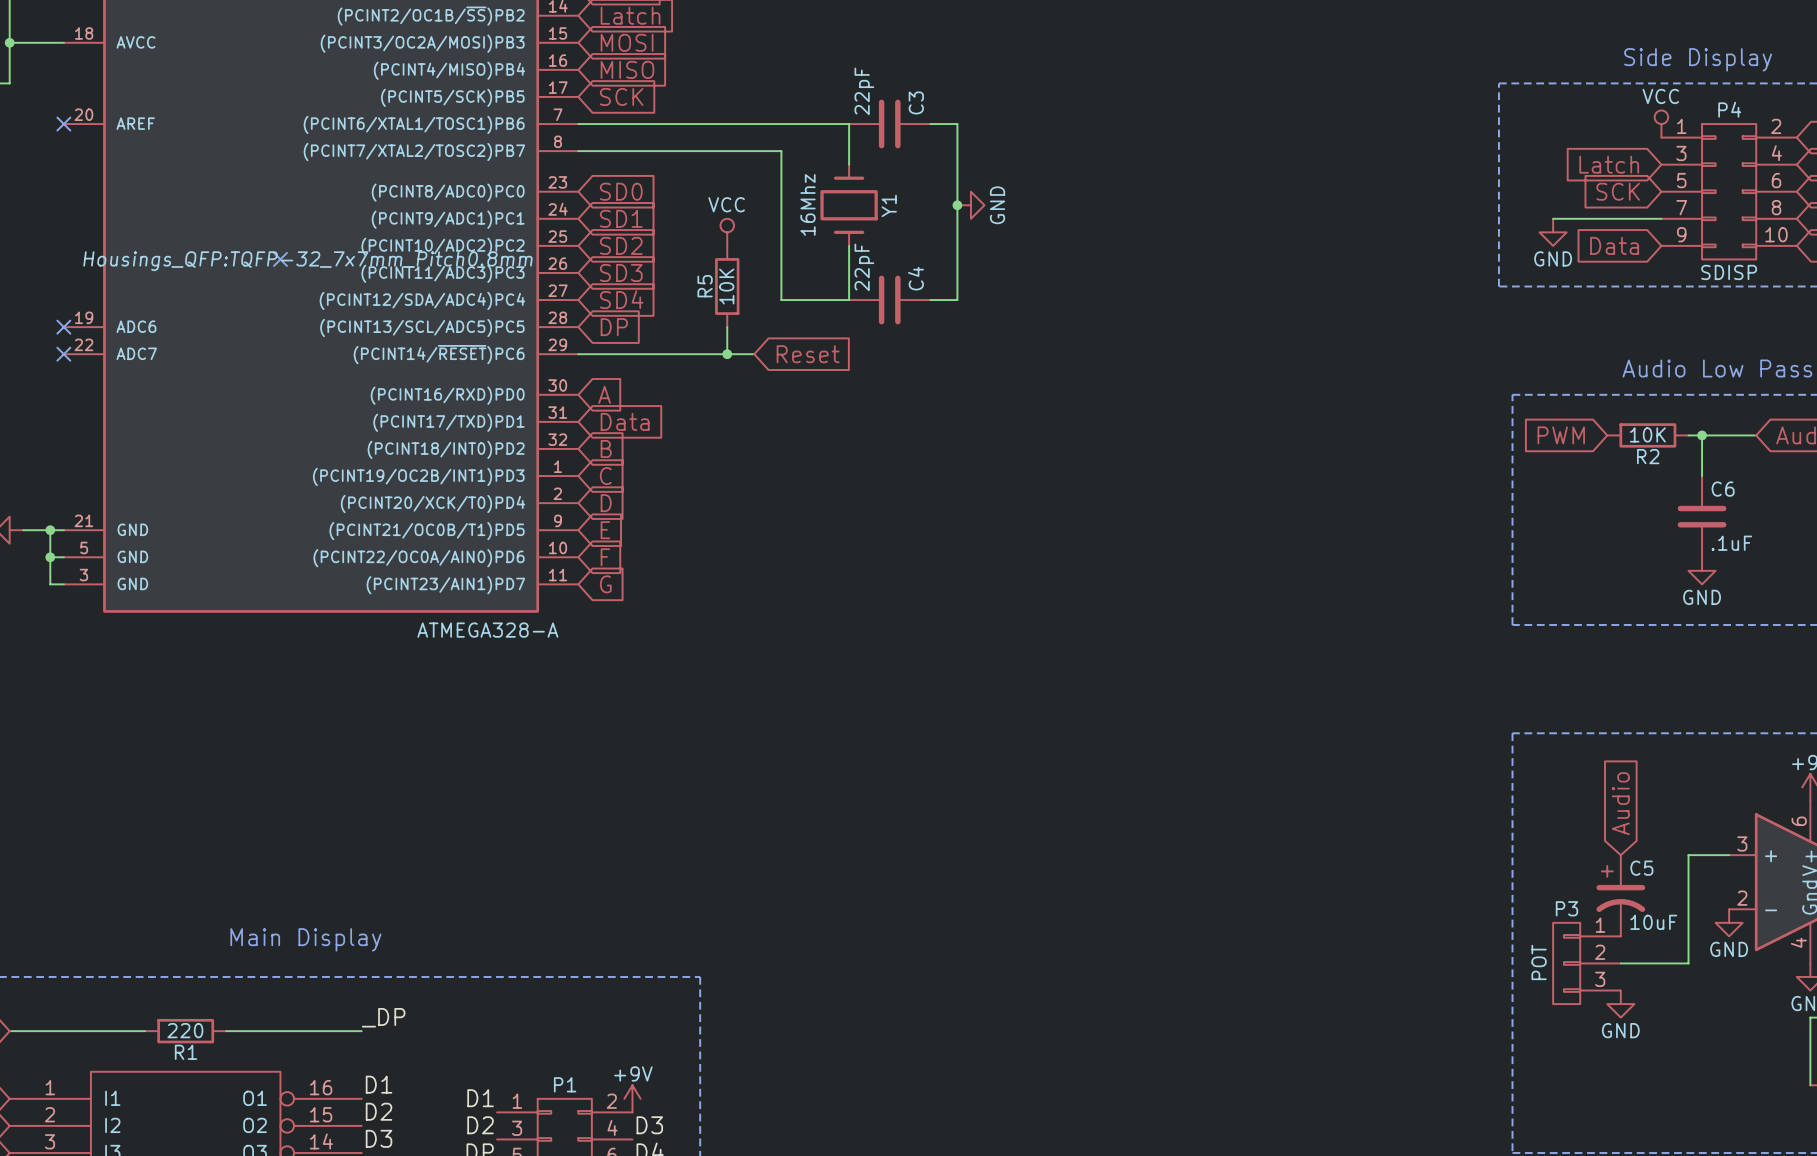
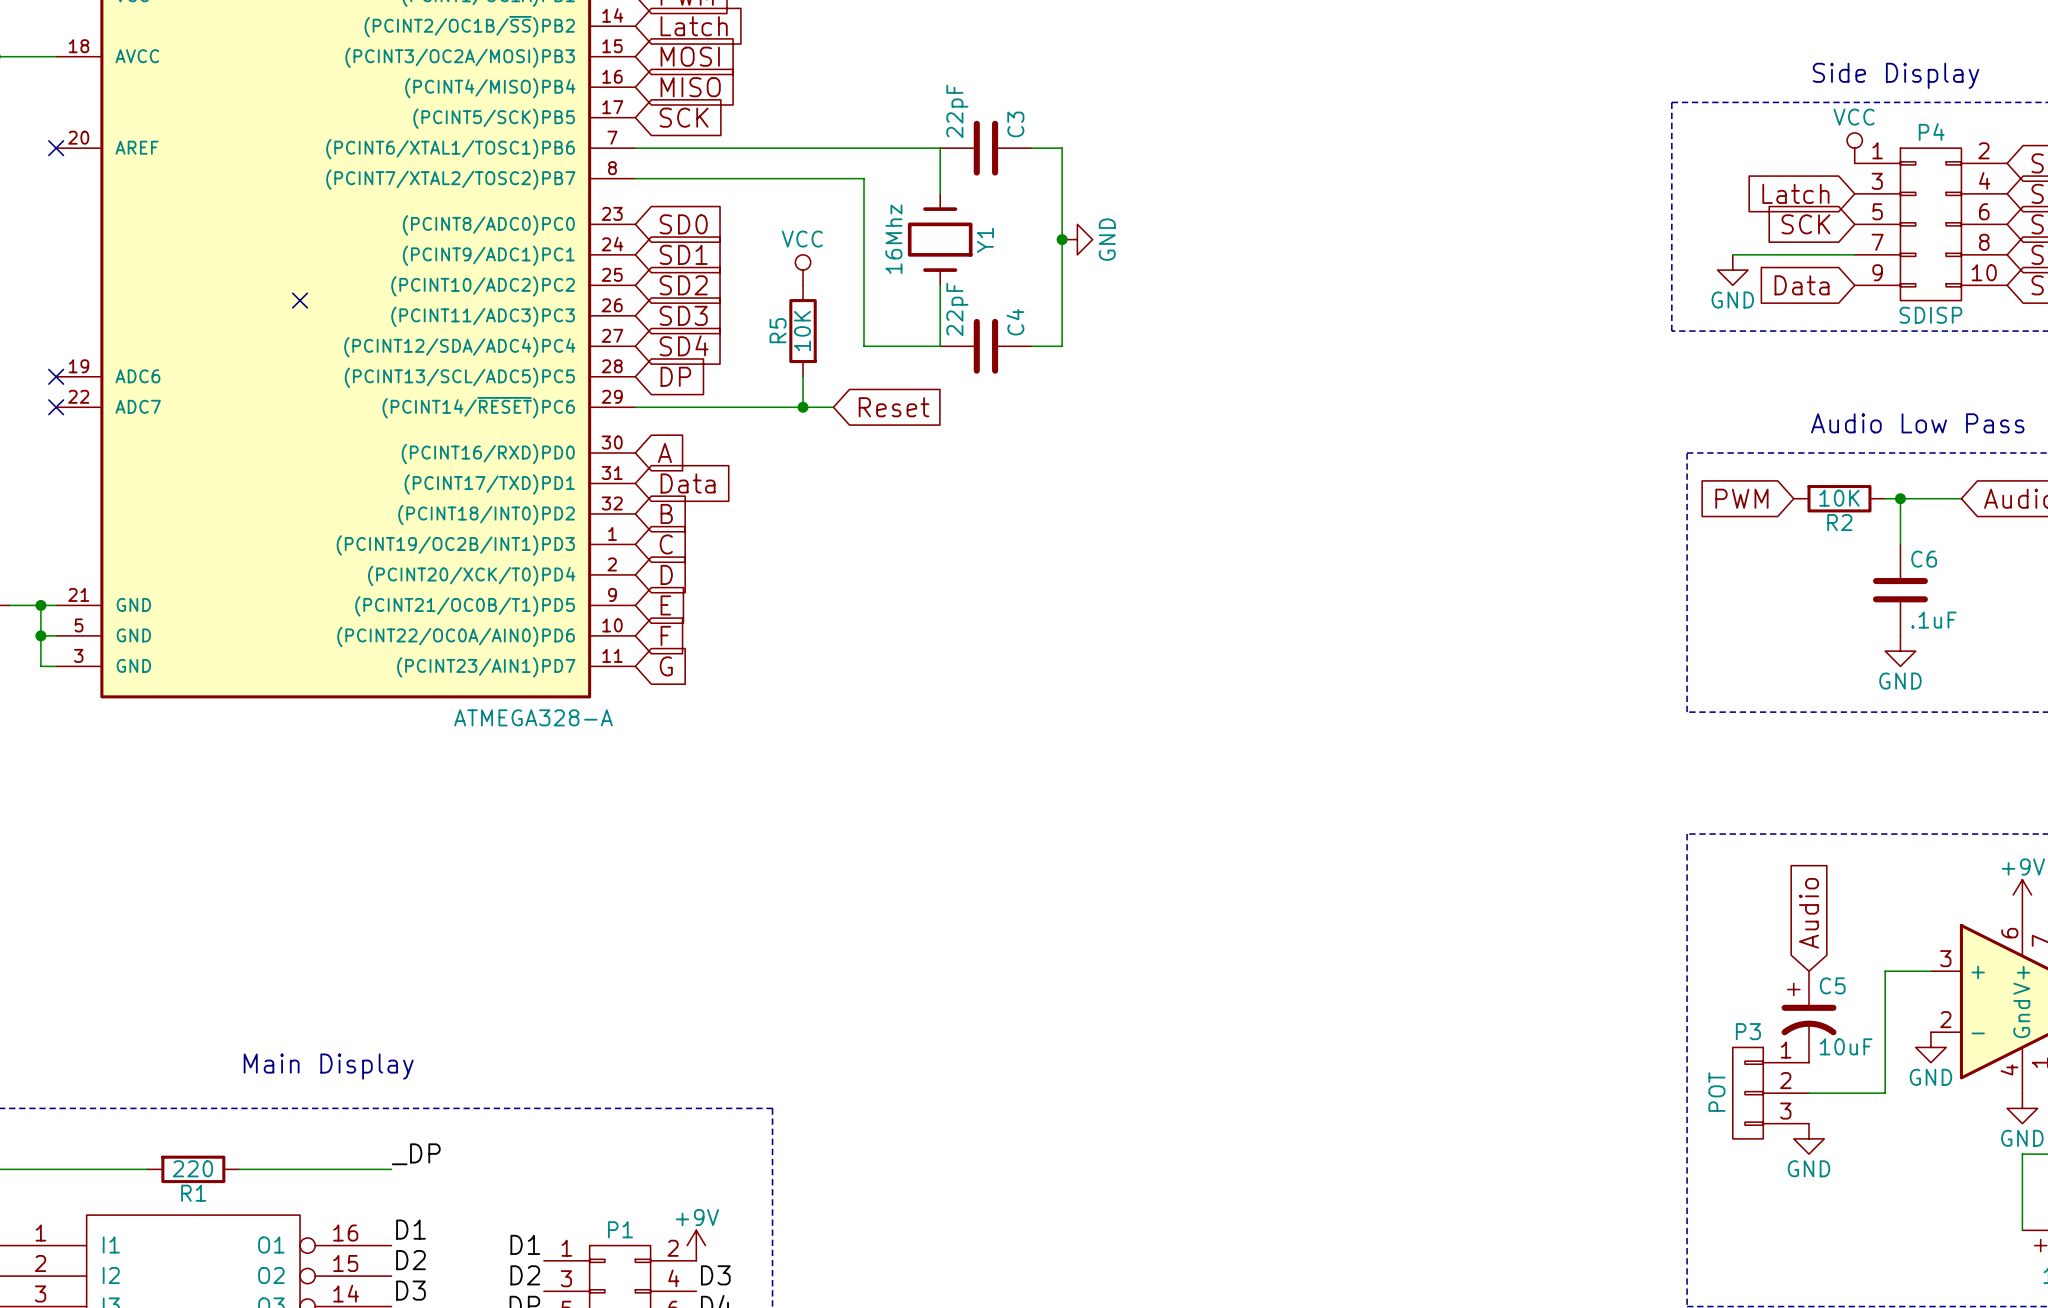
part text: Housings_QFP:TQFP-32_7x7mm_Pitch0.8mm (307, 261) -> none

